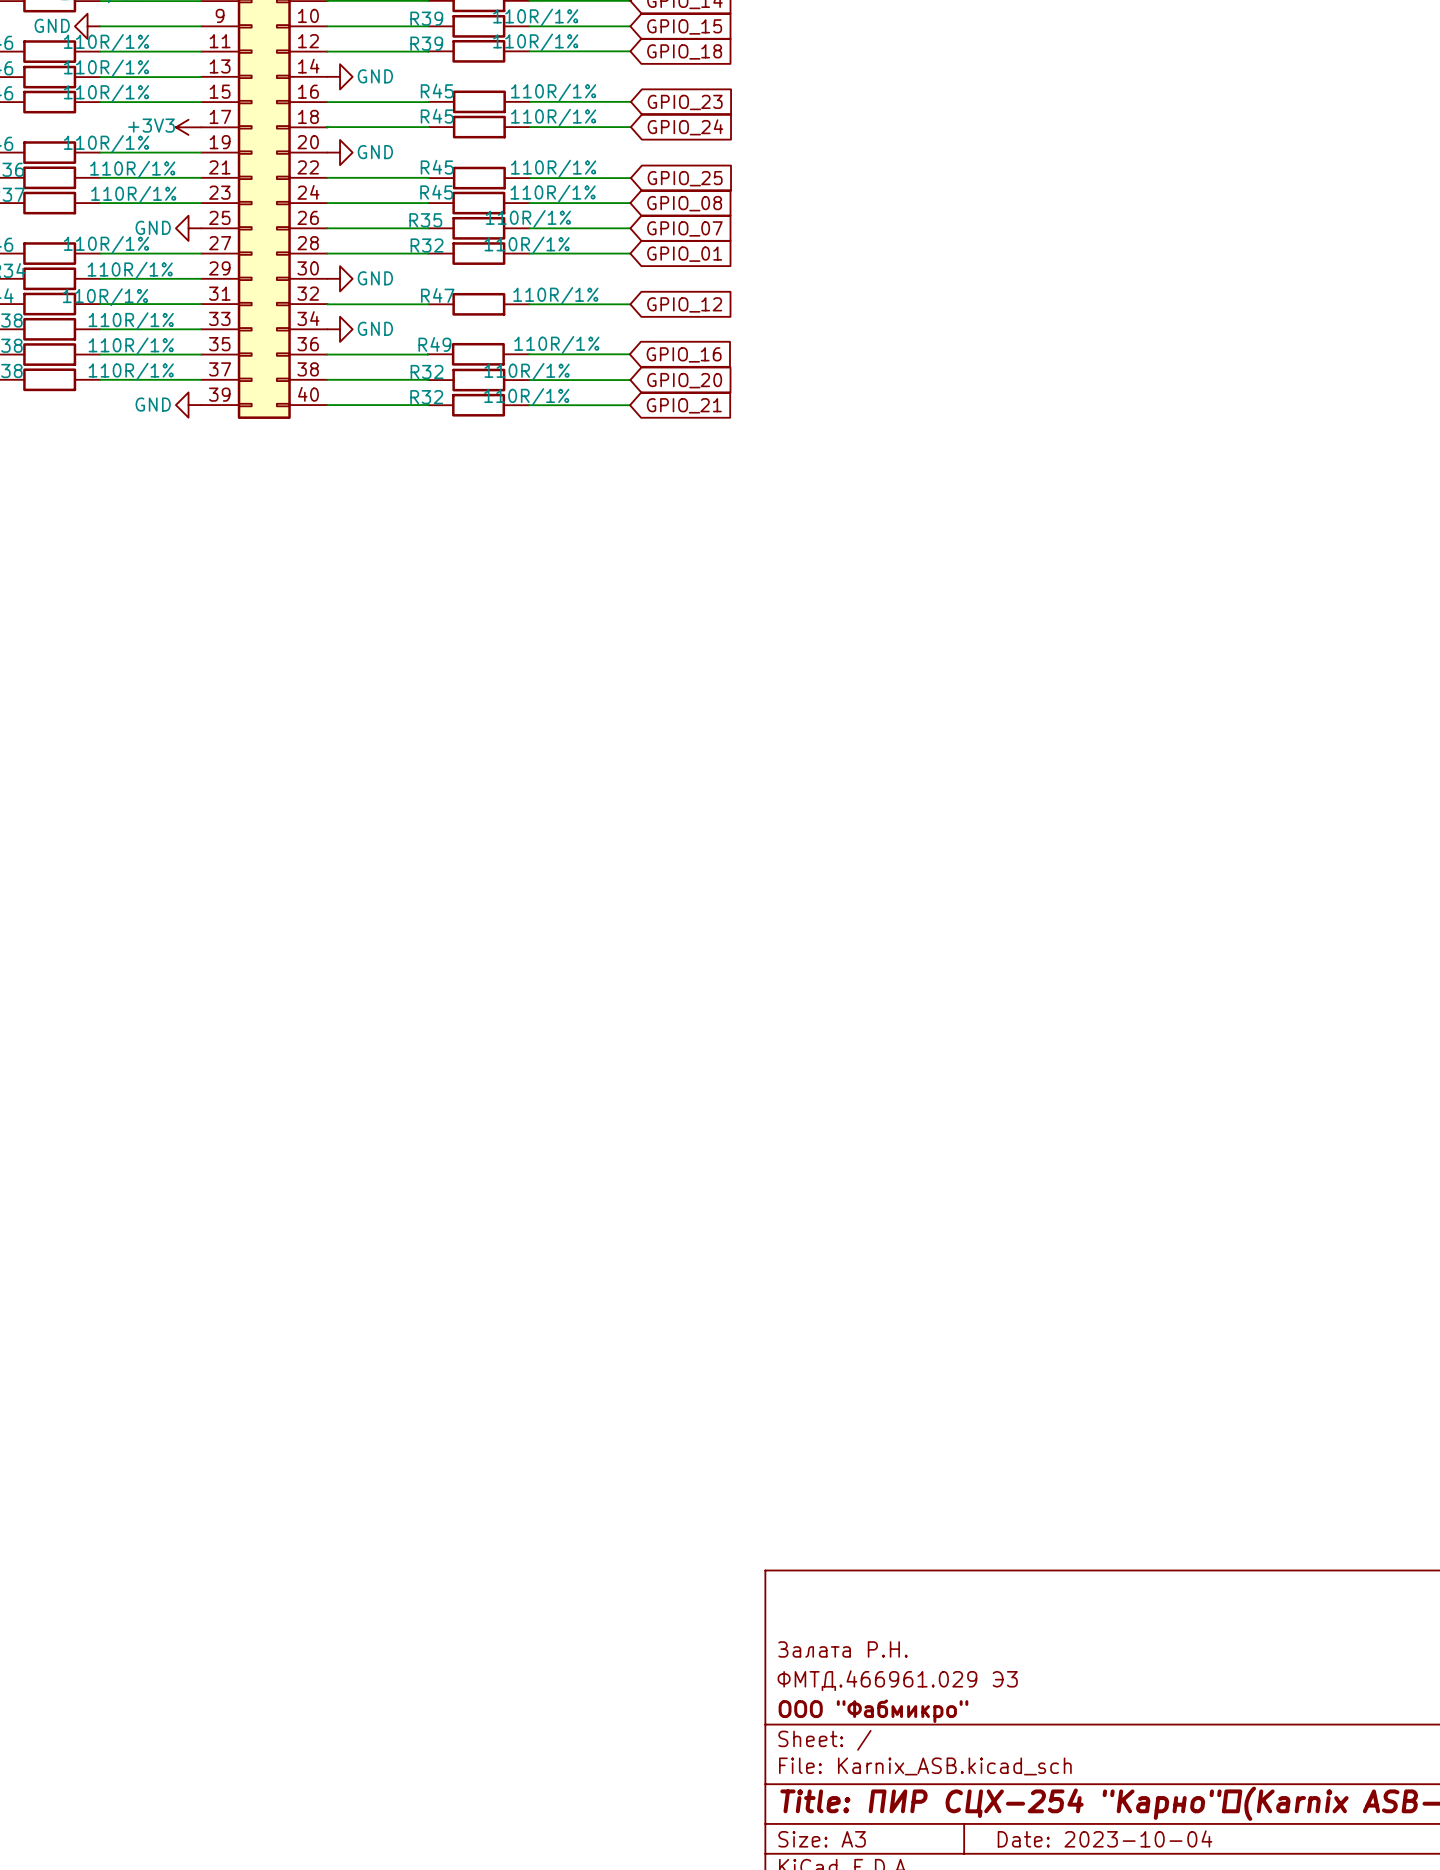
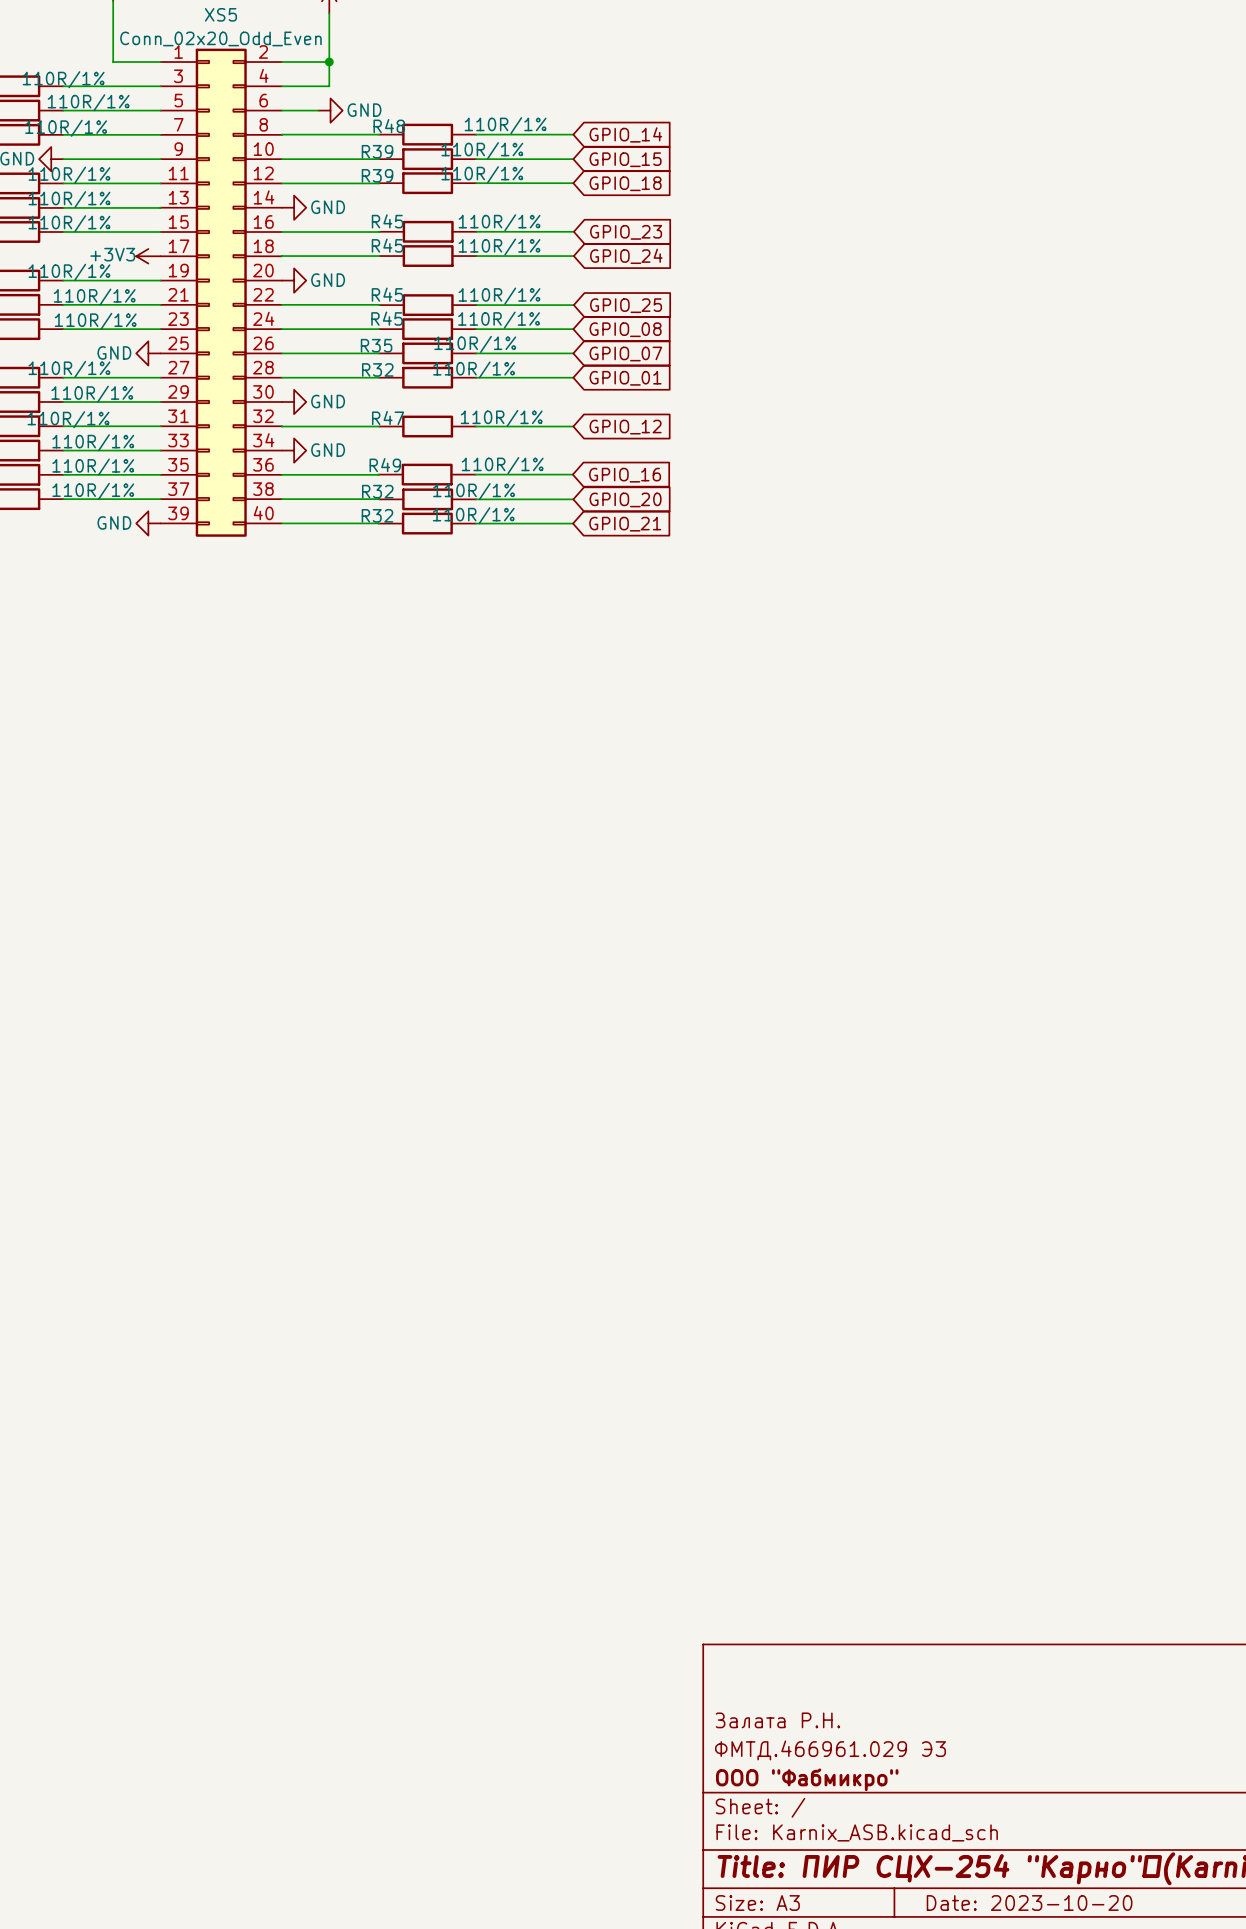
title block: Date: 2023-10-04 (1105, 1838) -> Date: 2023-10-20 (1029, 1903)

